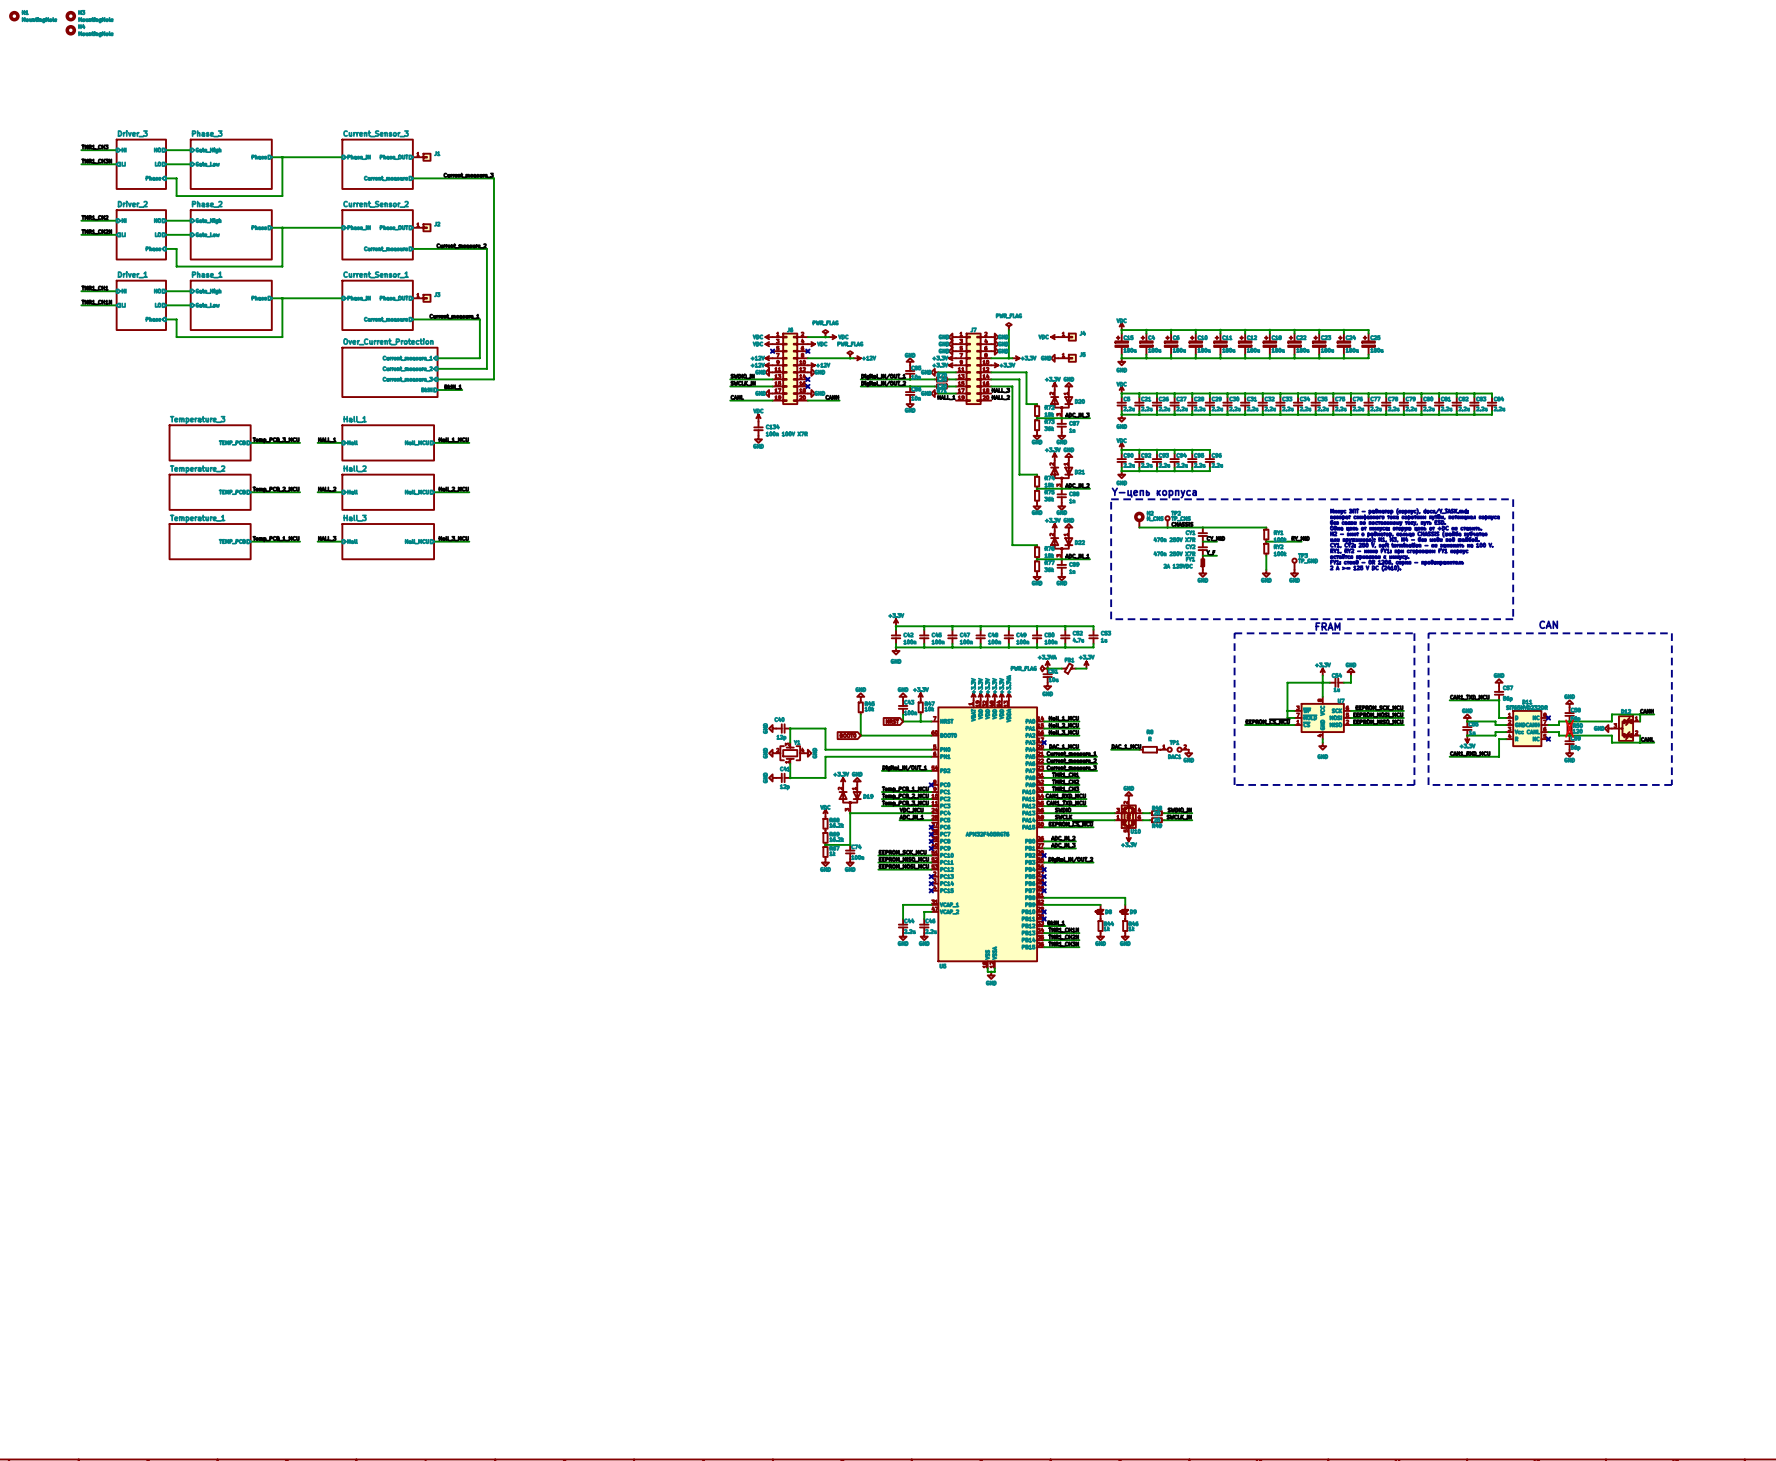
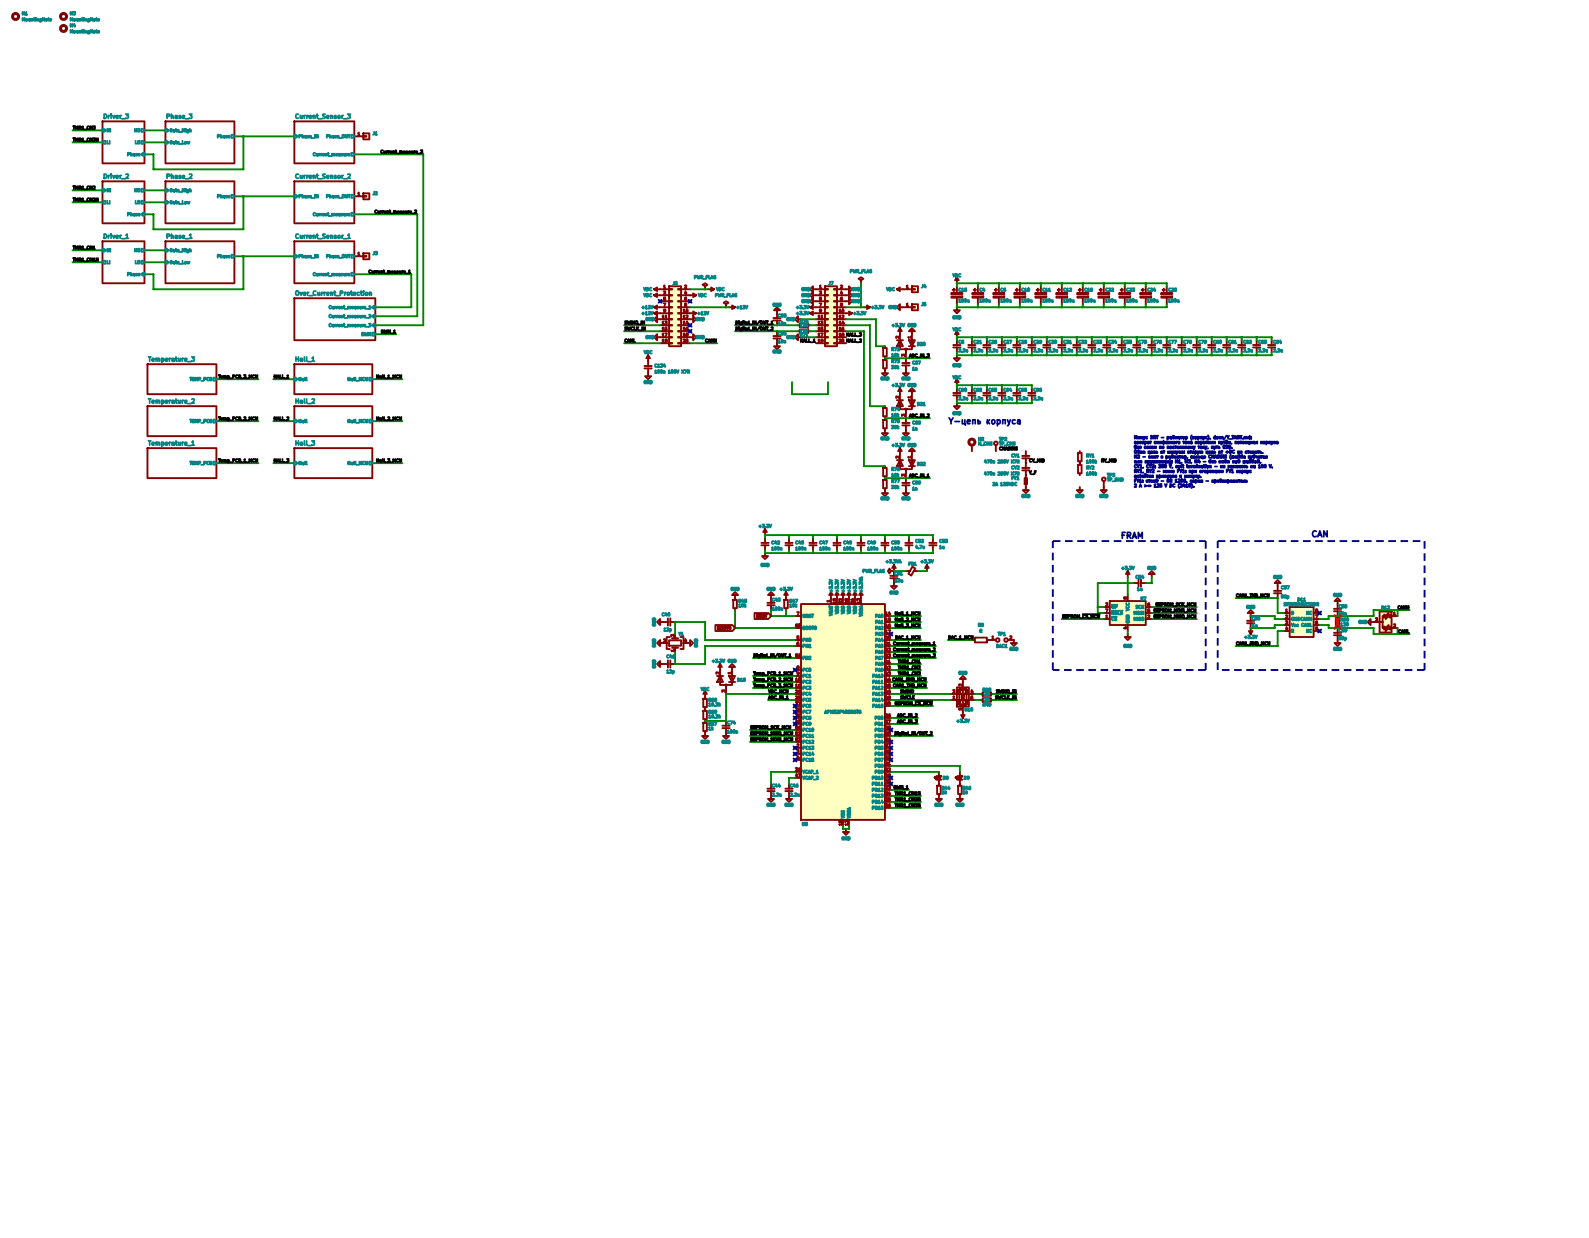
wire: none -> (792, 382) (792, 394) (827, 394) (827, 382)
line: (1111, 499) (1513, 499) (1513, 619) (1111, 619) (1111, 499) -> none
wire: (1139, 527) (1266, 527) -> none
wire: (1202, 541) (1216, 541) -> none
wire: (1266, 541) (1301, 541) -> none
wire: (1202, 555) (1216, 555) -> none
wire: (1266, 555) (1266, 569) -> none

